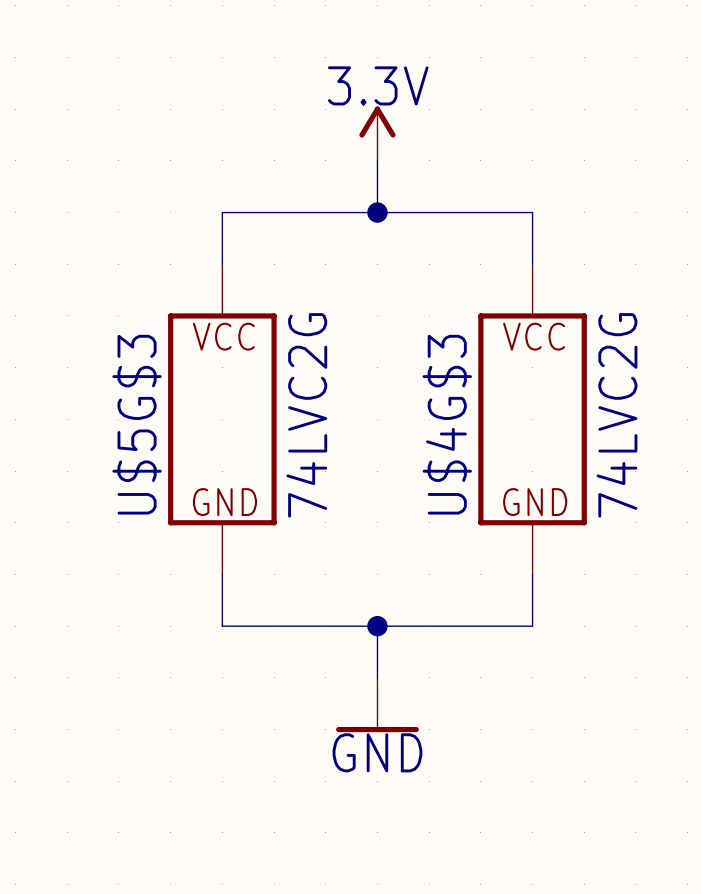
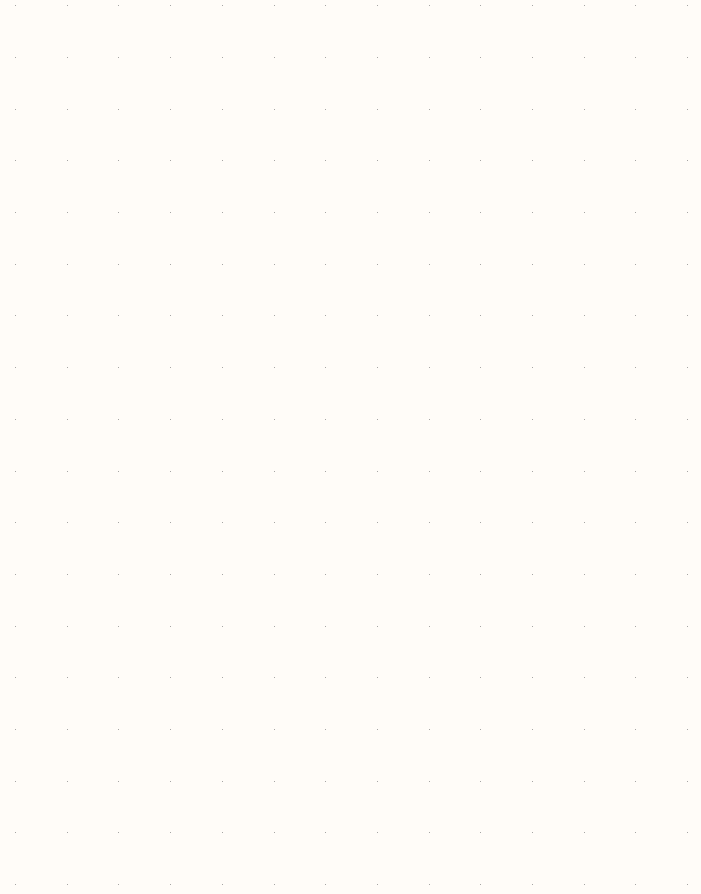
power symbol: 3.3V (377, 133) -> none
wire: (377, 160) (377, 212) -> none
junction: (377, 212) -> none
wire: (222, 264) (222, 212) (532, 212) (532, 264) -> none
U$5G$3: 74LVC2G (222, 419) -> none
U$4G$3: 74LVC2G (532, 419) -> none
wire: (222, 574) (222, 626) (532, 626) (532, 574) -> none
wire: (377, 626) (377, 677) -> none
junction: (377, 626) -> none
power symbol: GND (377, 705) -> none

